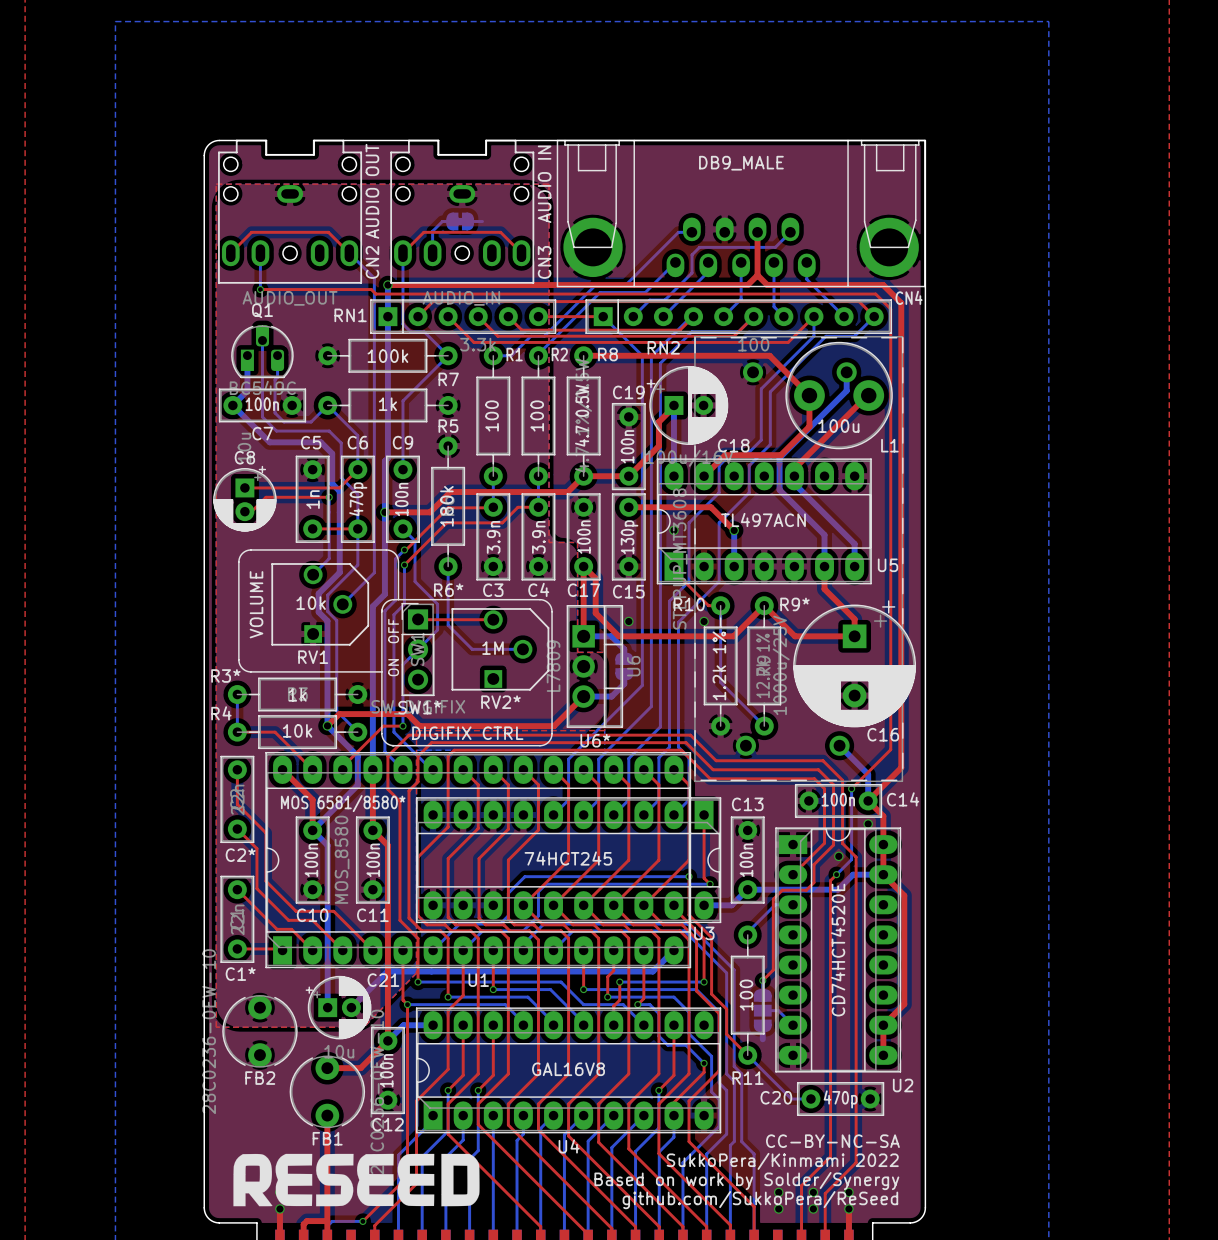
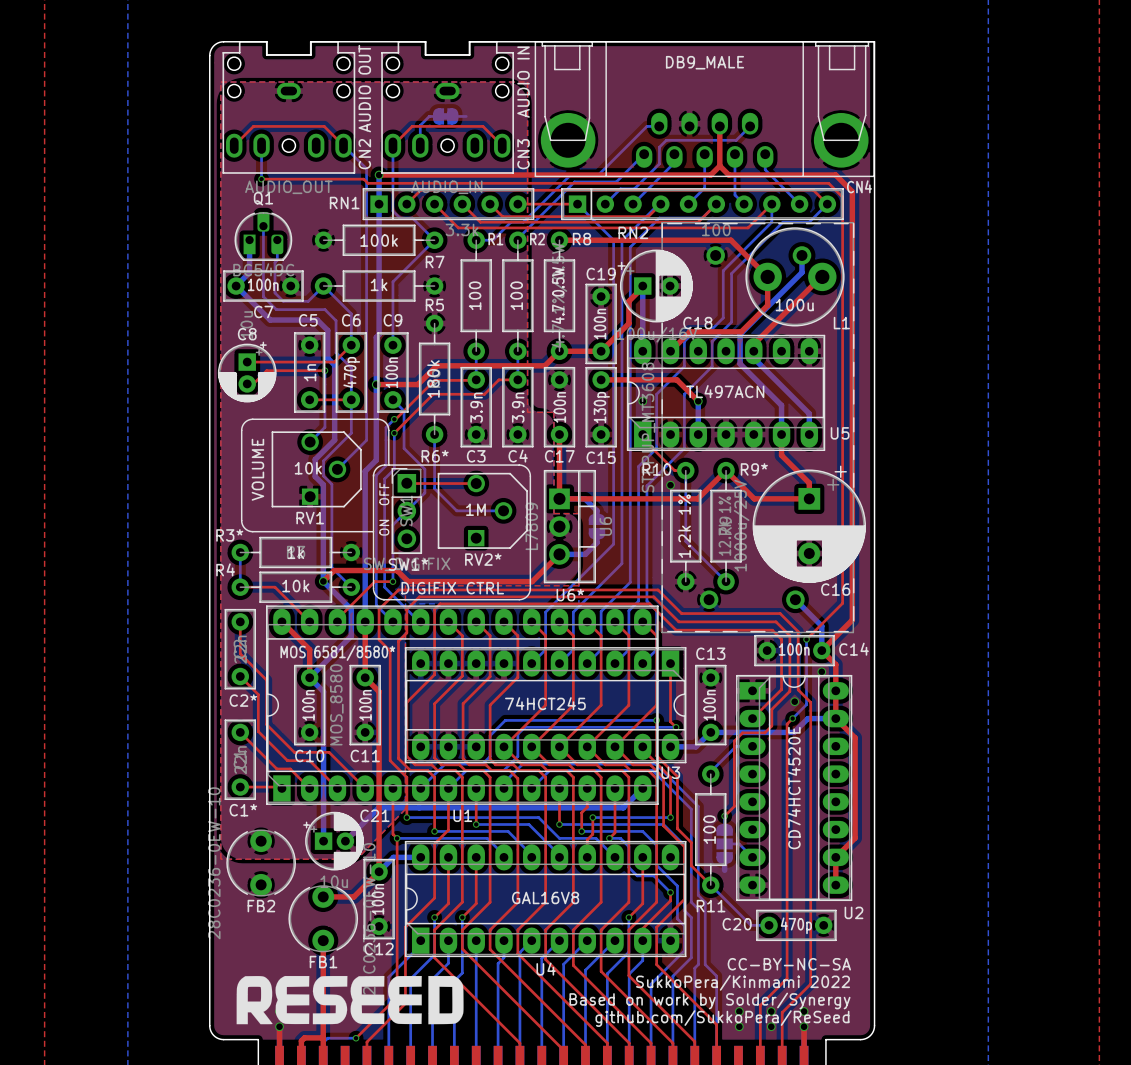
top track: (583, 566) (595, 578) (595, 613) (618, 636) -> (559, 498) (591, 498)
via: (628, 621) -> none

